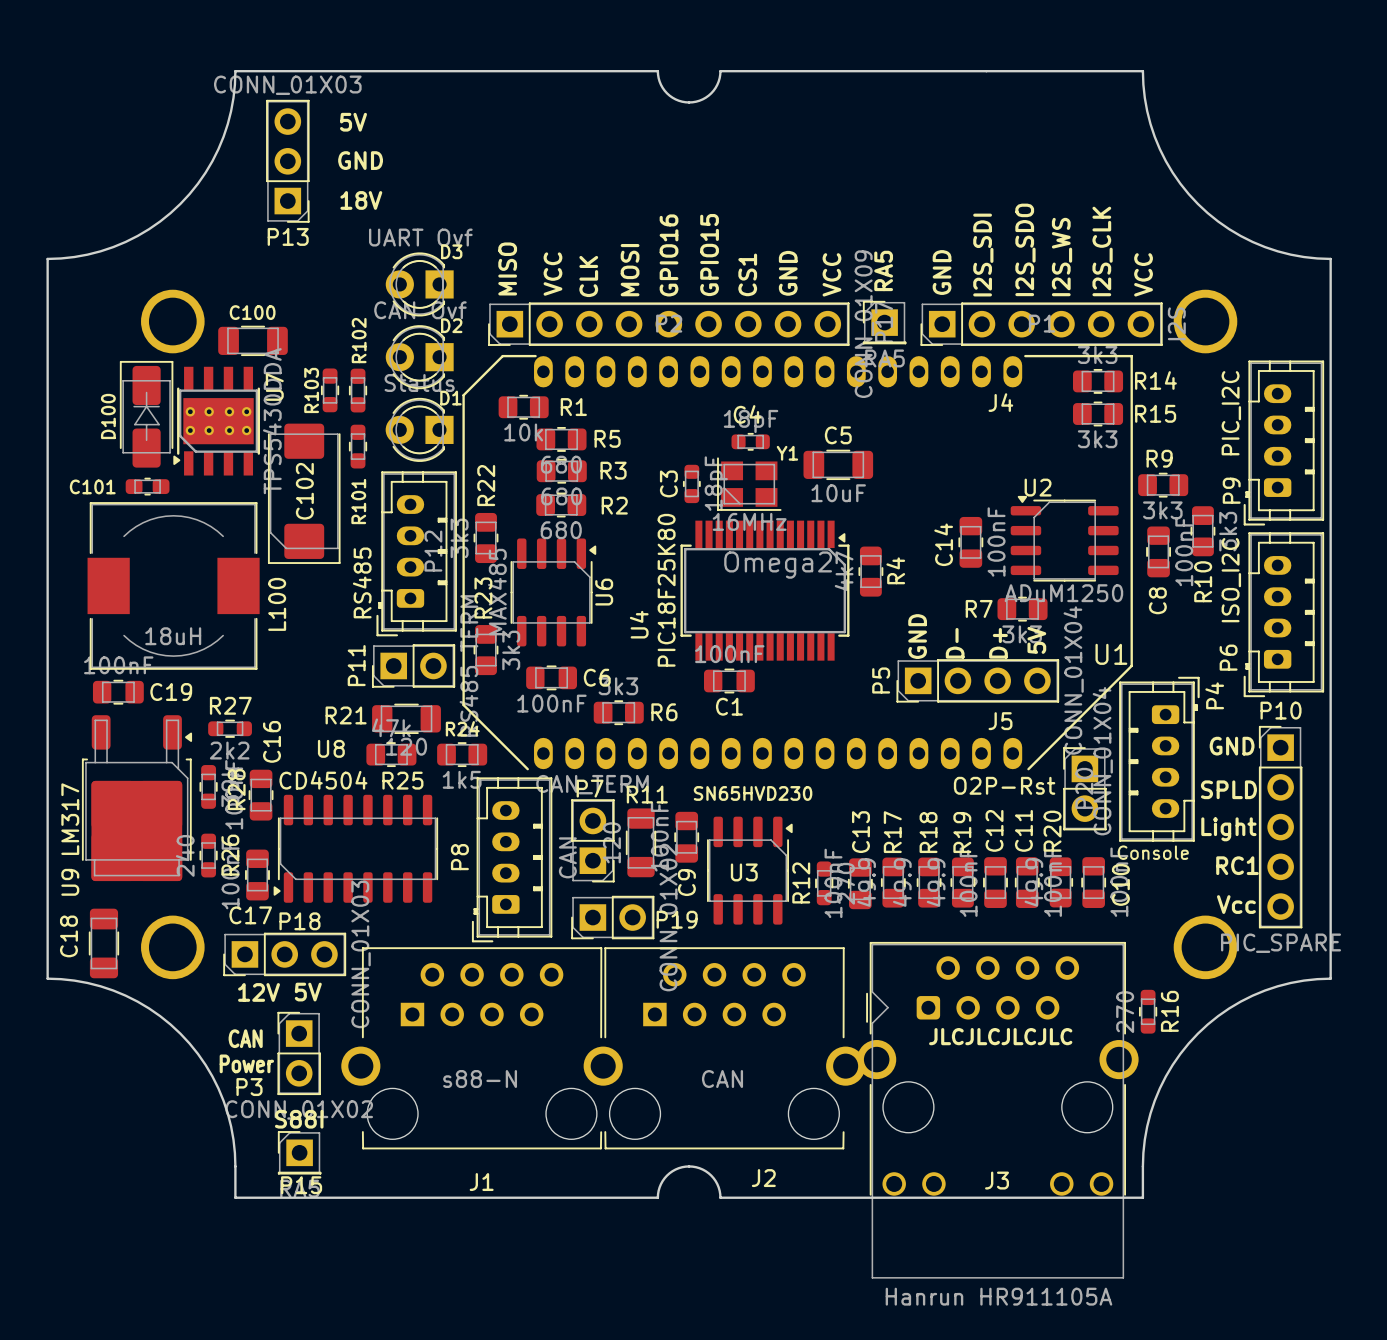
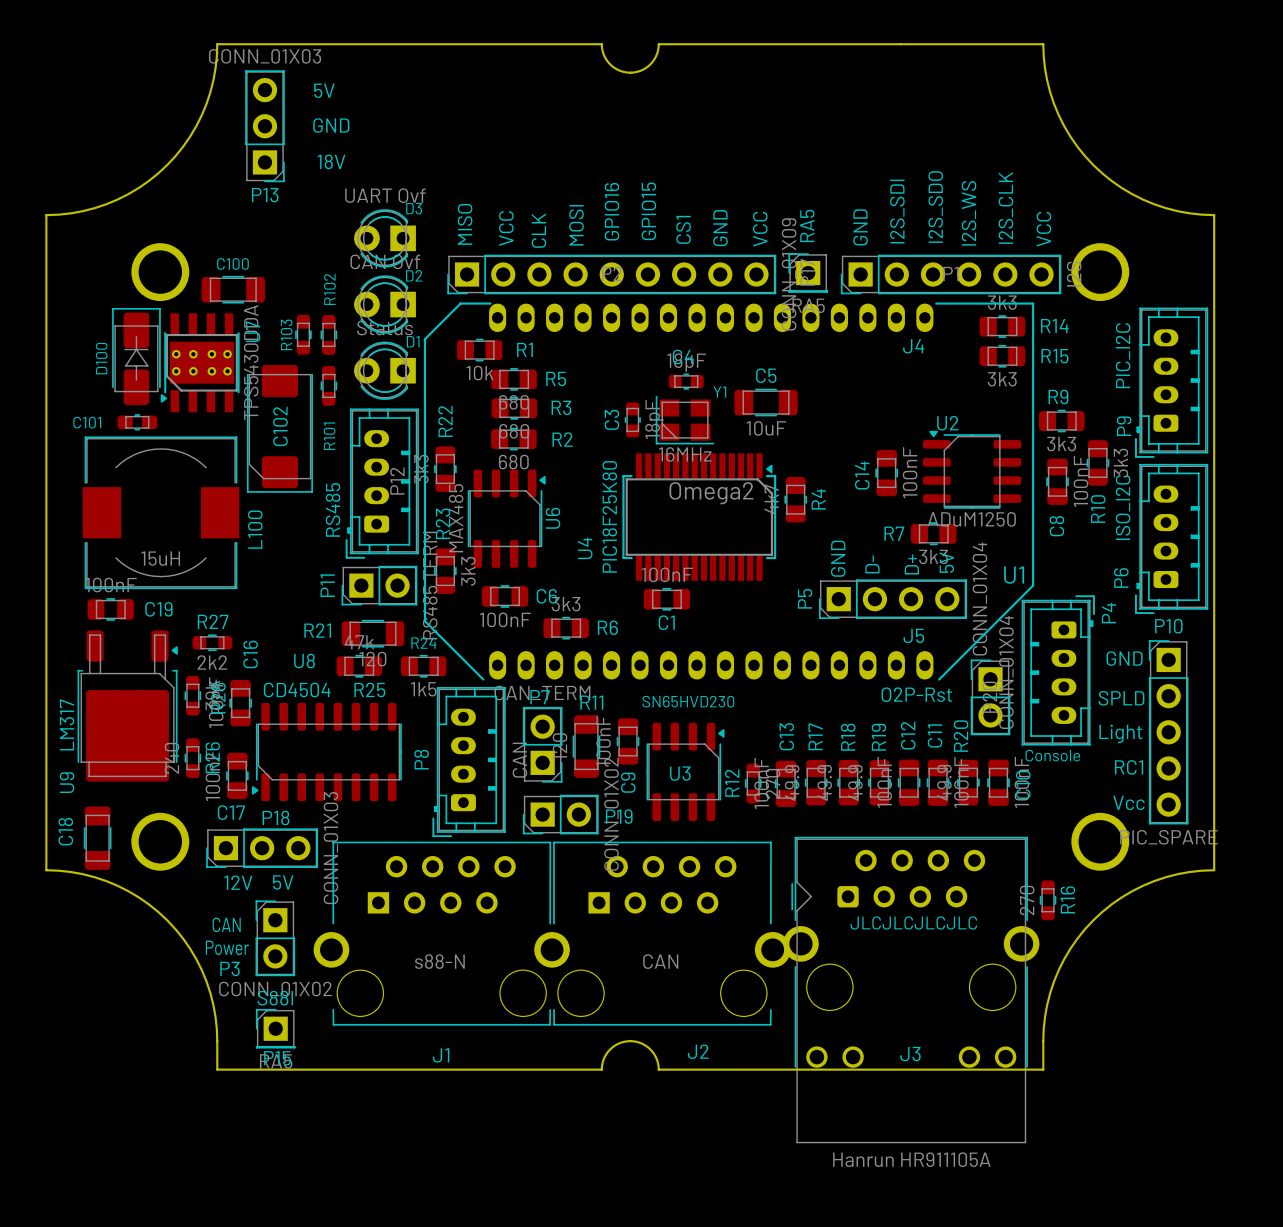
L100 value: 18uH (173, 636) -> 15uH (160, 558)

